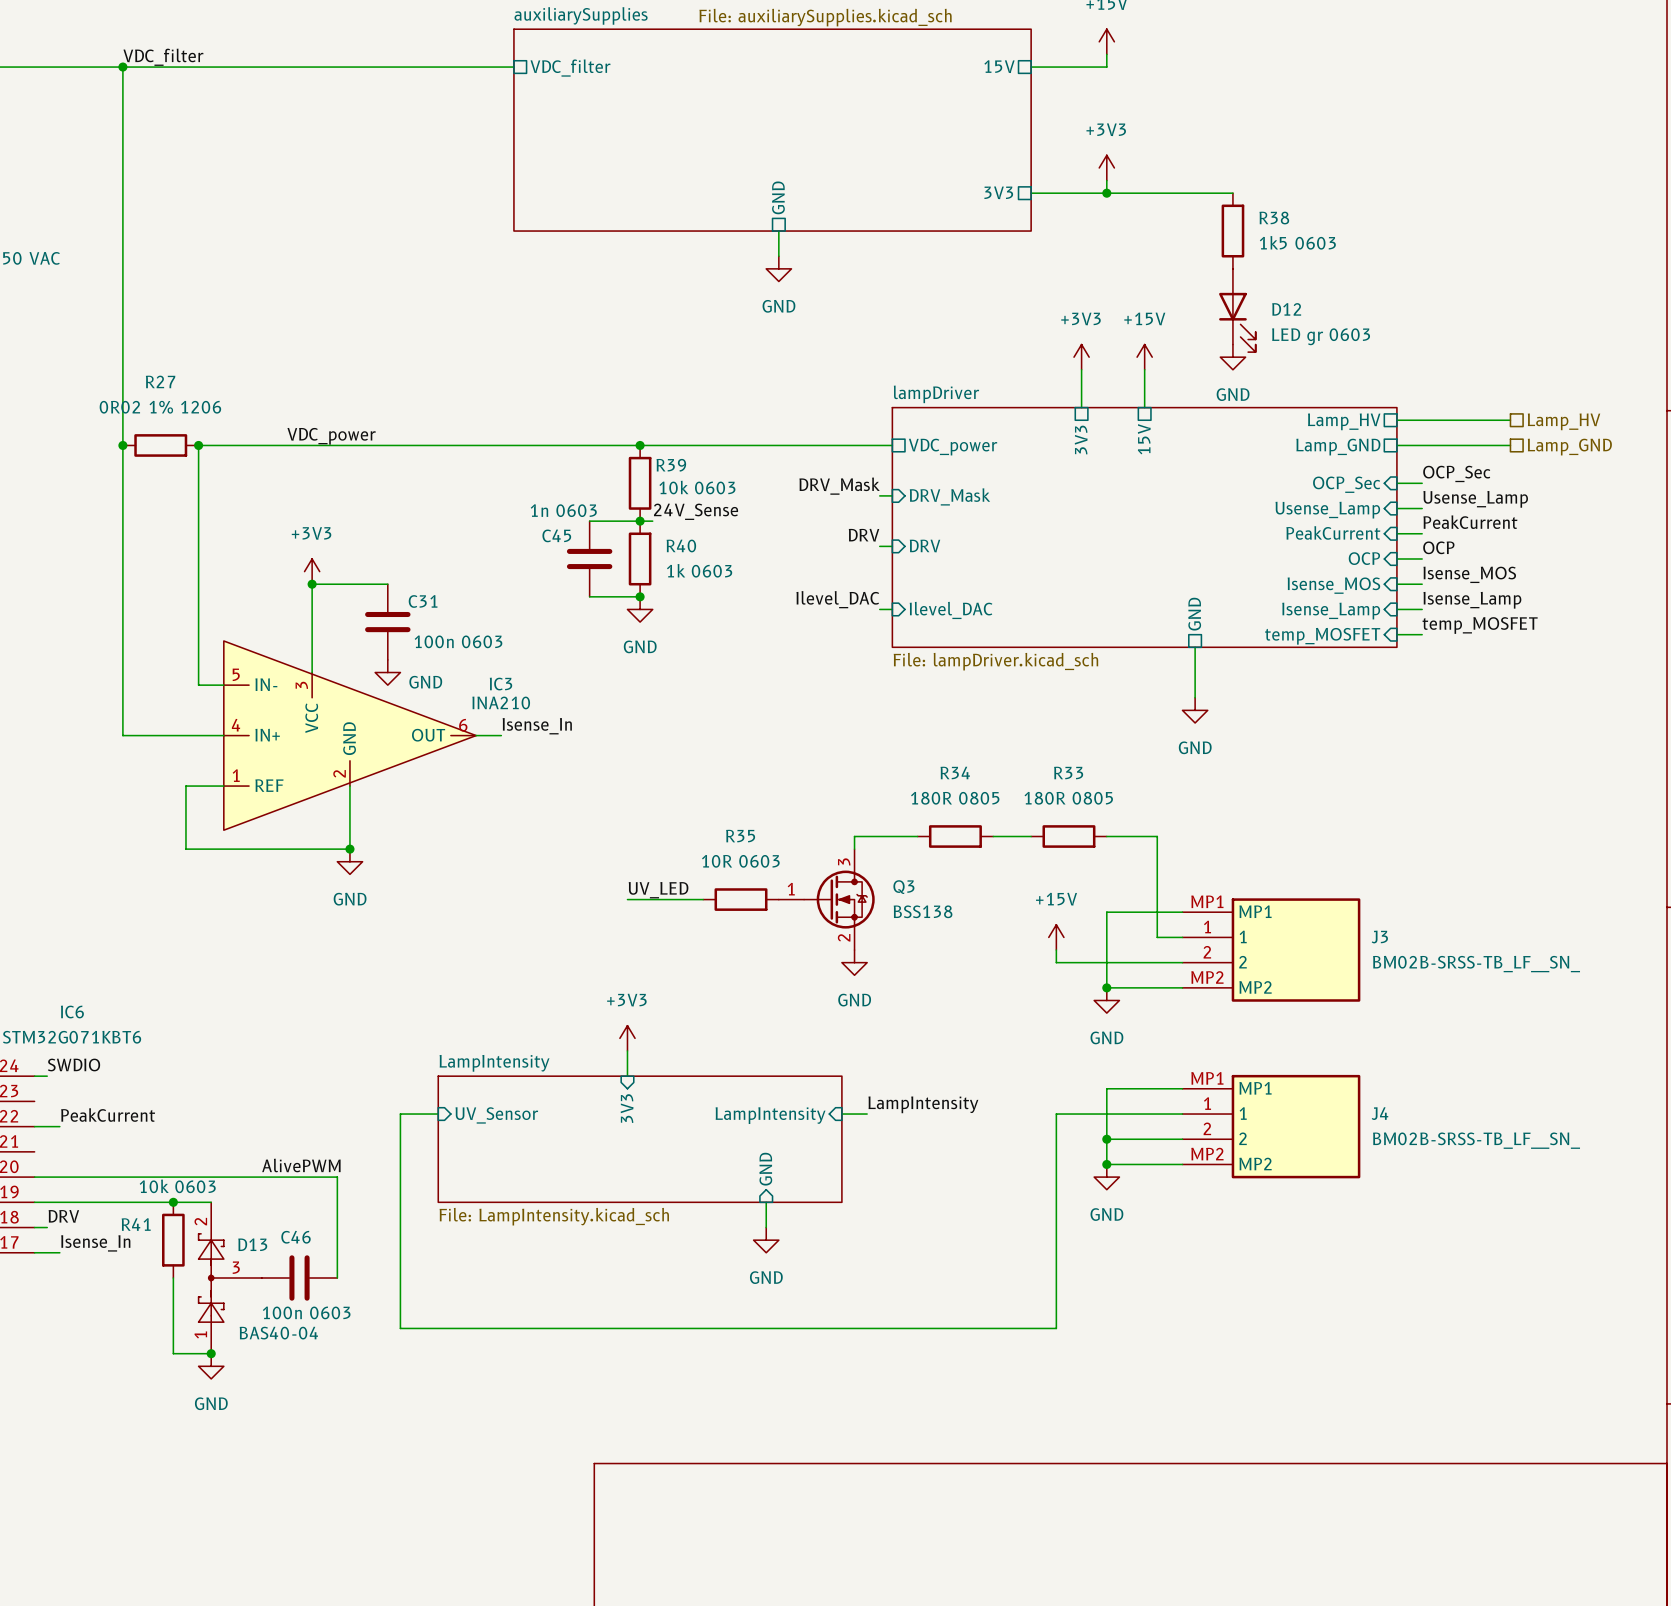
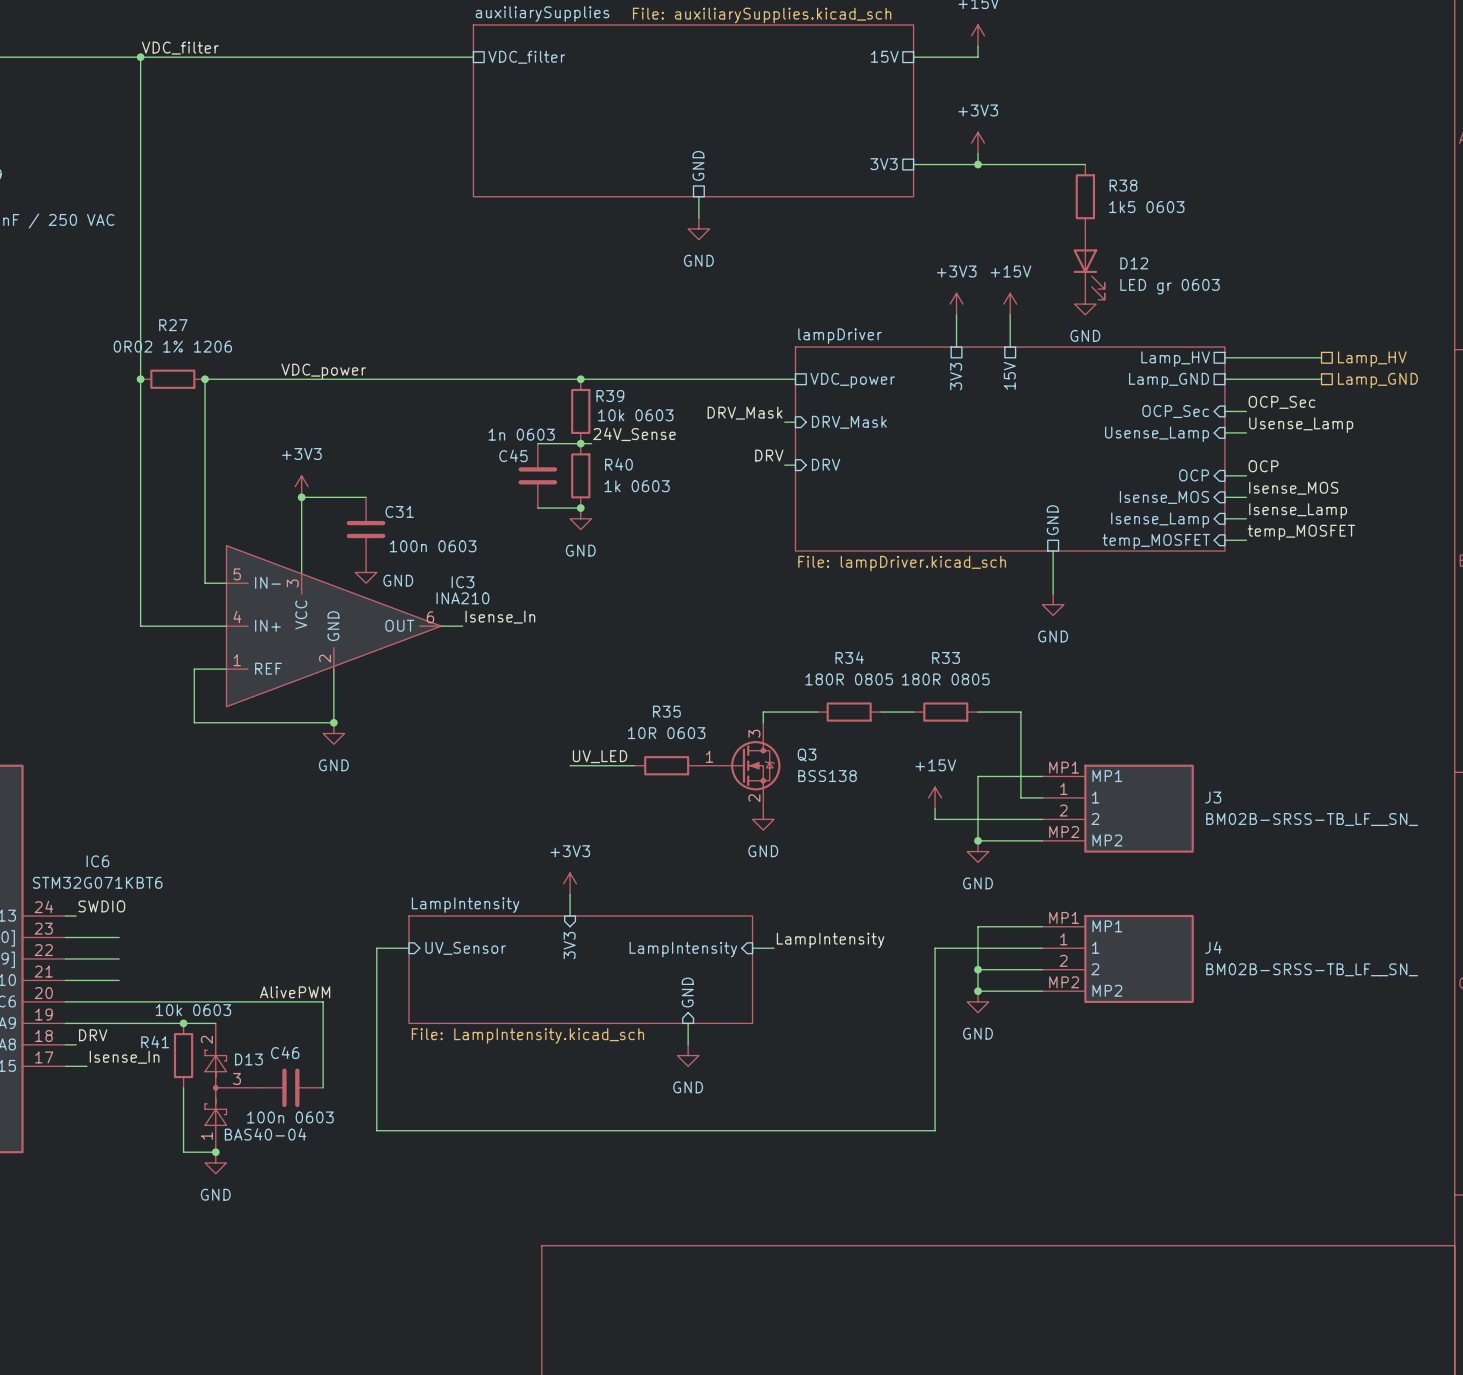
label: PeakCurrent (1470, 522) -> none
sheet pin: PeakCurrent (1333, 532) -> none
wire: (1396, 533) (1422, 533) -> none
label: Ilevel_DAC (837, 599) -> none
wire: (879, 609) (892, 609) -> none
sheet pin: Ilevel_DAC (951, 610) -> none
wire: none -> (65, 937) (119, 937)
label: PeakCurrent (108, 1115) -> none
wire: none -> (86, 958) (119, 958)
wire: none -> (65, 980) (119, 980)

